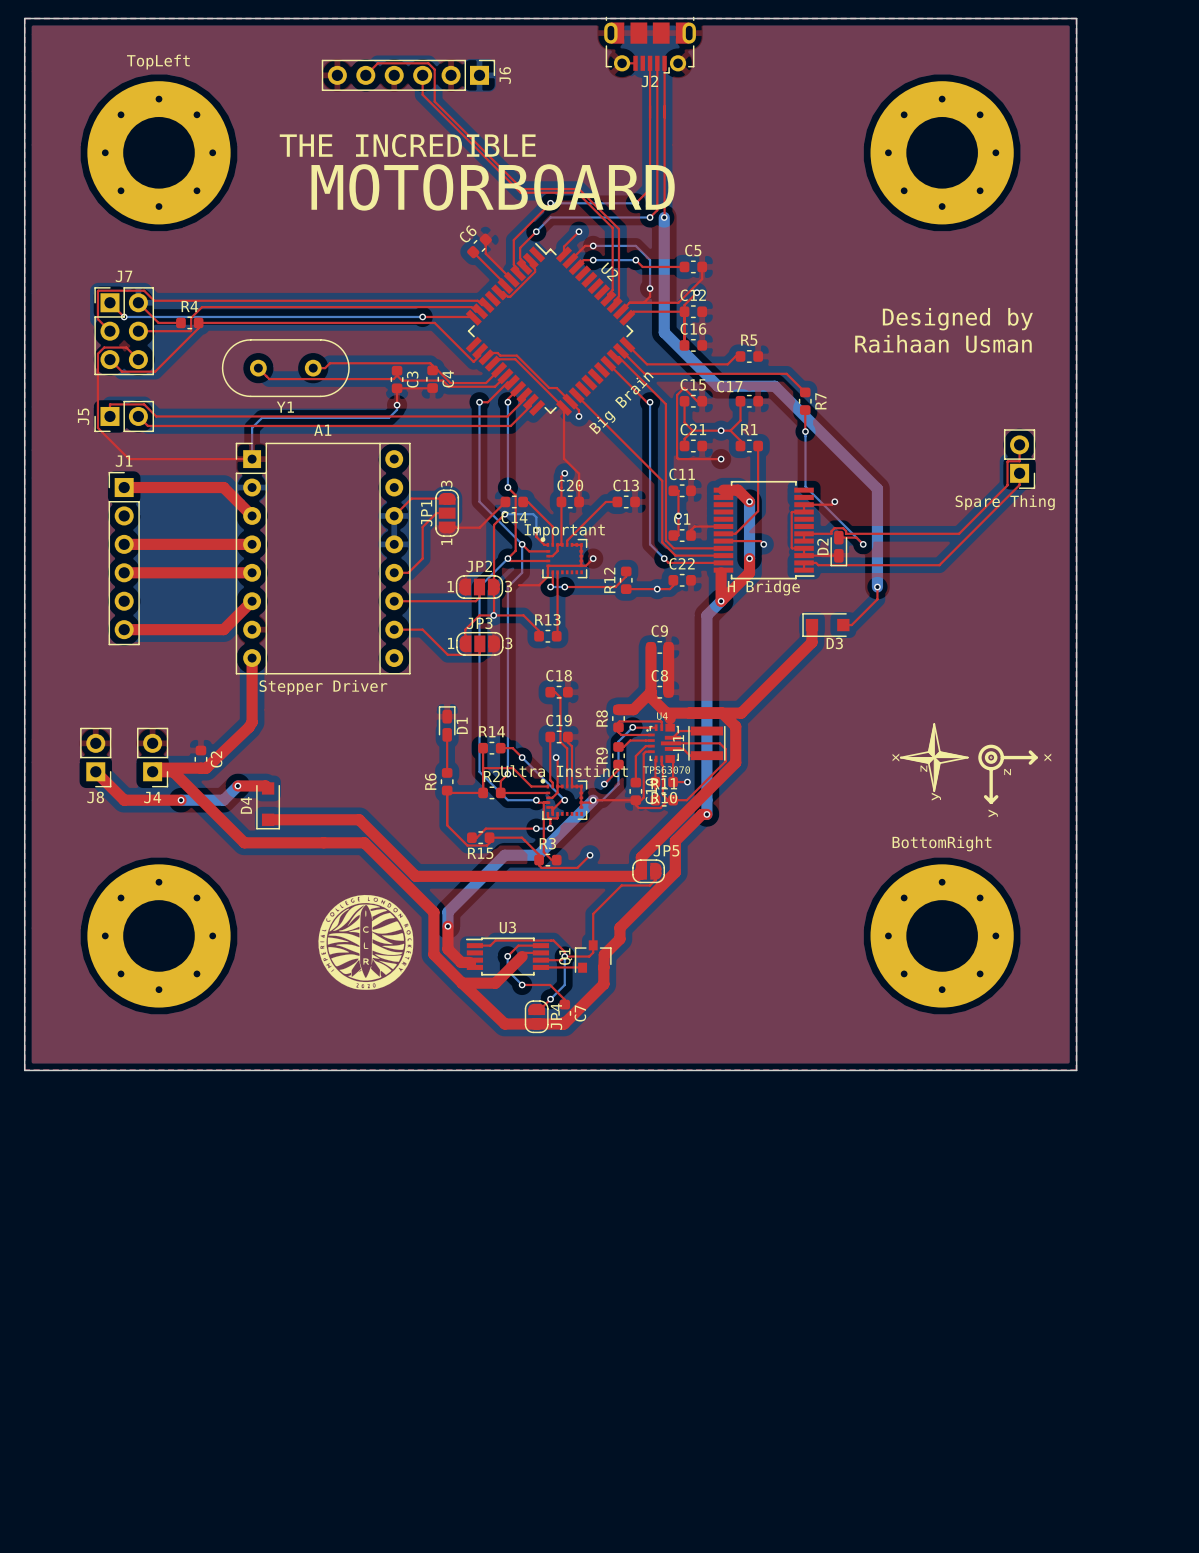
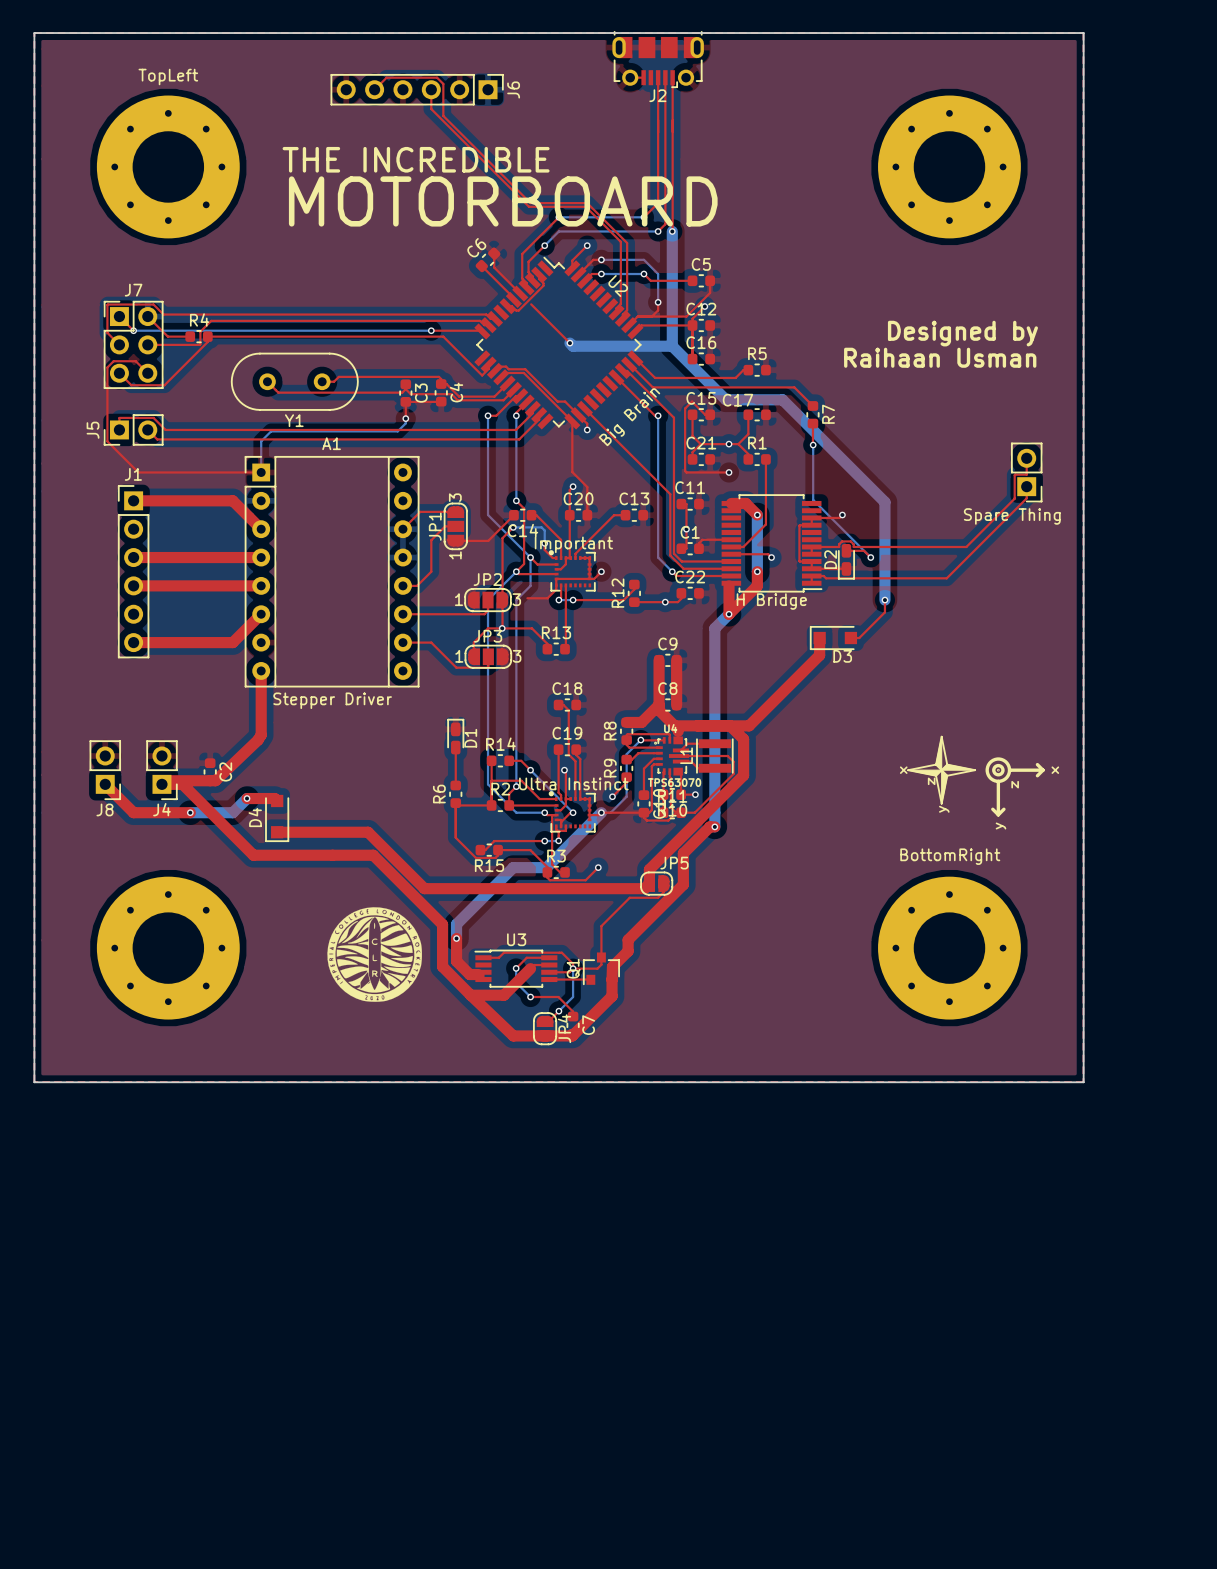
top track: none -> (531, 304) (569, 343)
bottom track: none -> (569, 343) (573, 346) (672, 346)
via: none -> (569, 343)

